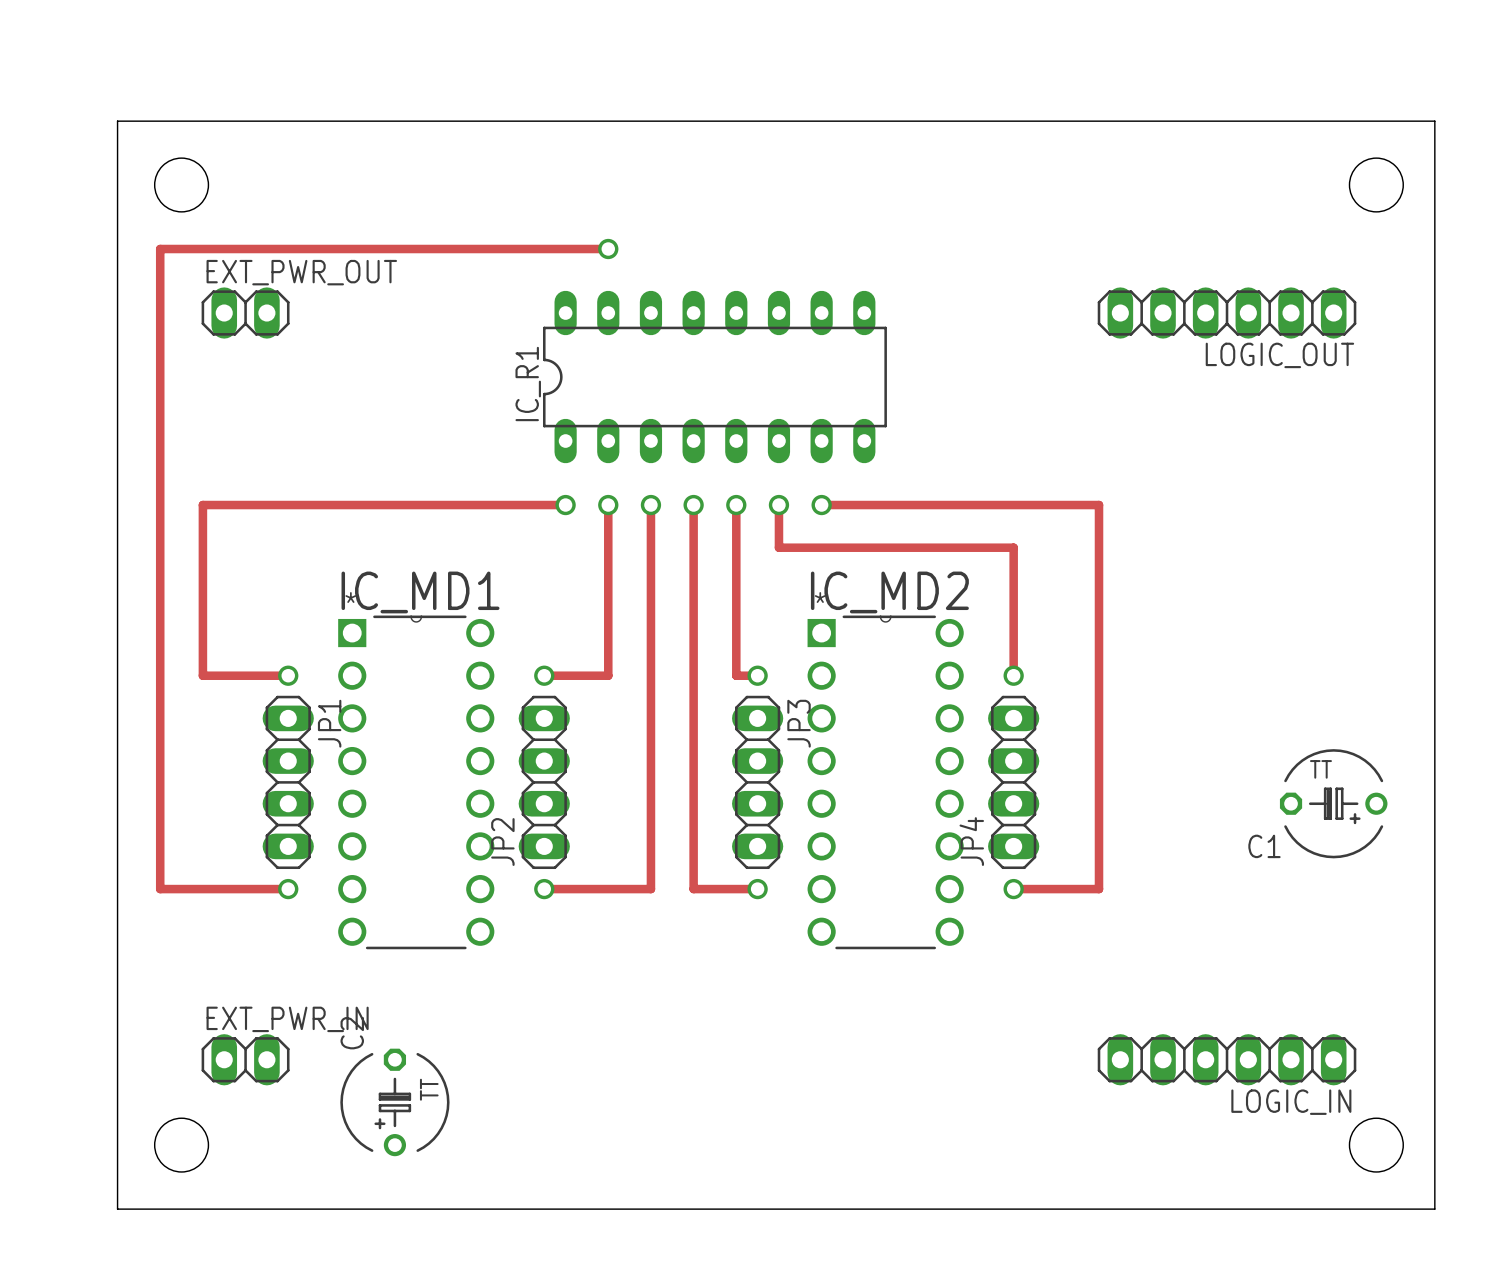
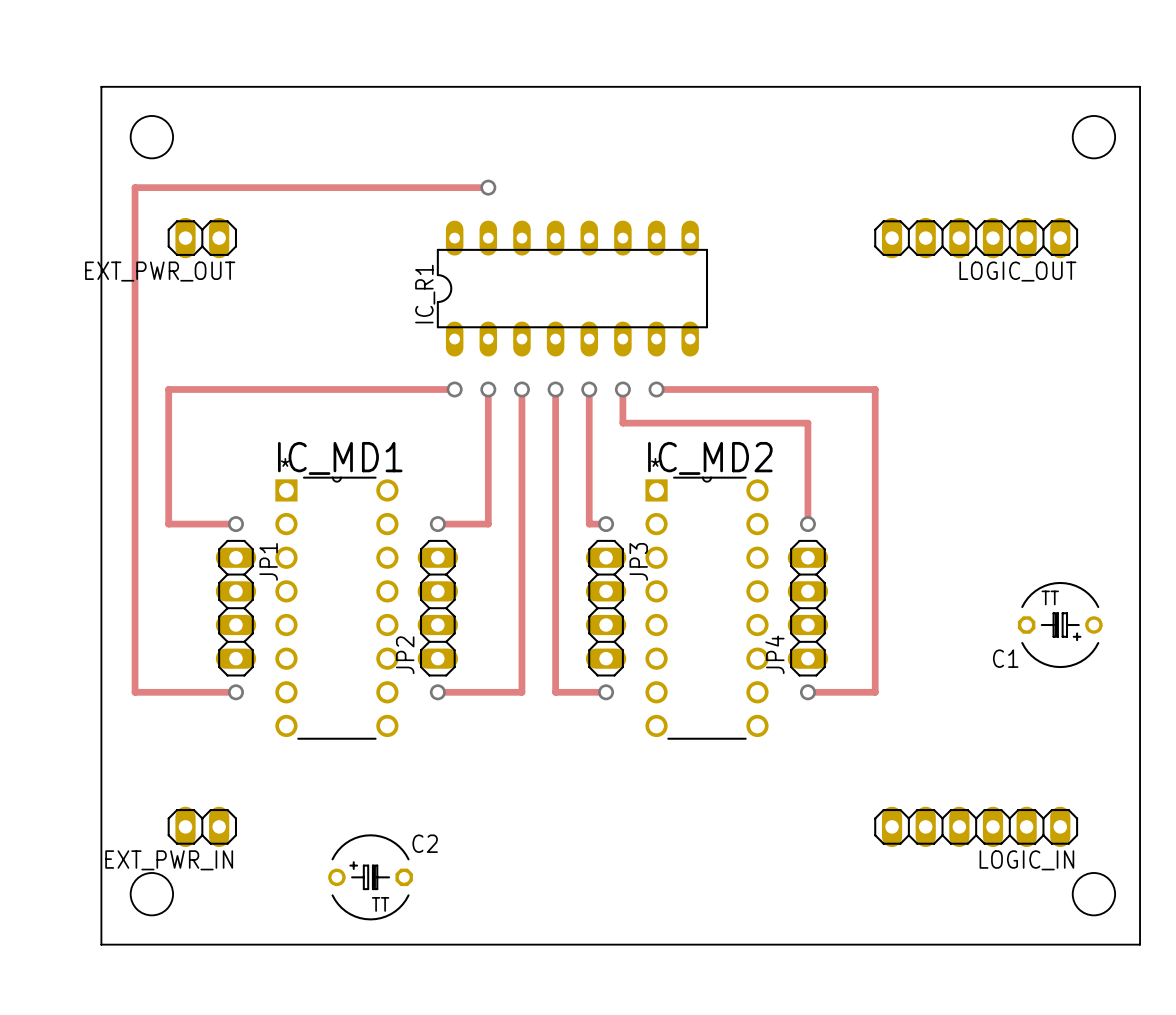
EXT_PWR_OUT name position: EXT_PWR_OUT (301, 272) -> EXT_PWR_OUT (160, 271)
EXT_PWR_IN name position: EXT_PWR_IN (287, 1019) -> EXT_PWR_IN (169, 860)
C2 rotation: 0° (394, 1102) -> 90° clockwise (370, 877)
C2 position: (394, 1102) -> (370, 877)

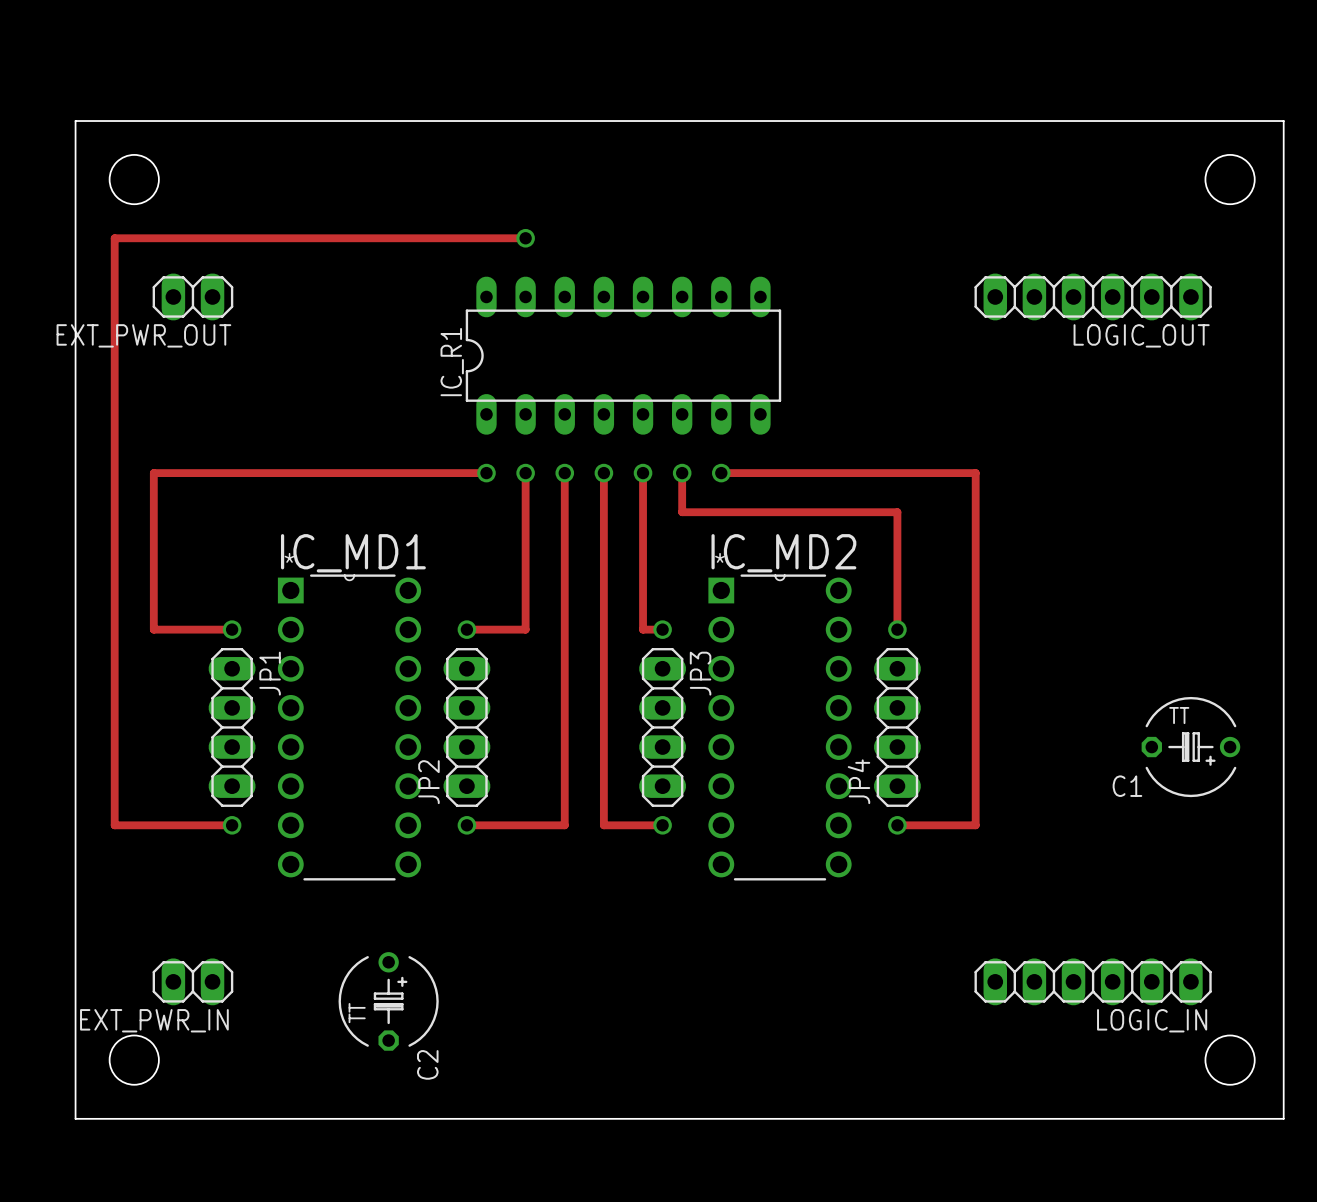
C2 footprint: [328, 834, 413, 921] -> [338, 952, 439, 1051]
C2 name position: C2 (425, 843) -> C2 (427, 1064)

